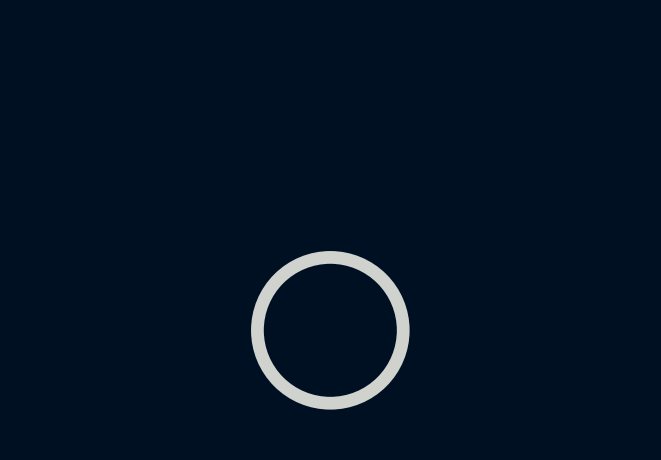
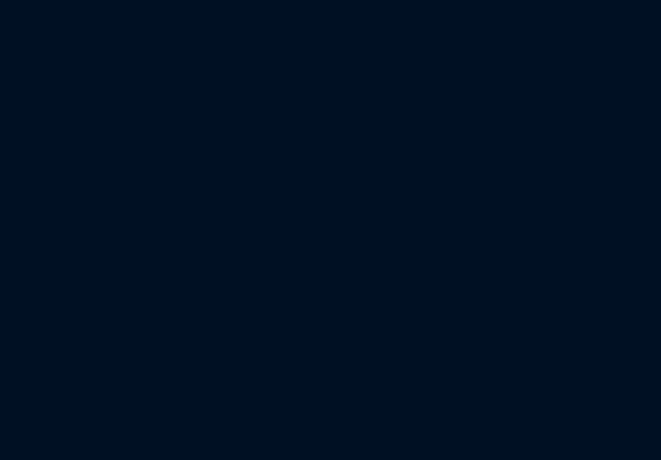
round board edge: [251, 251, 410, 410] -> none

